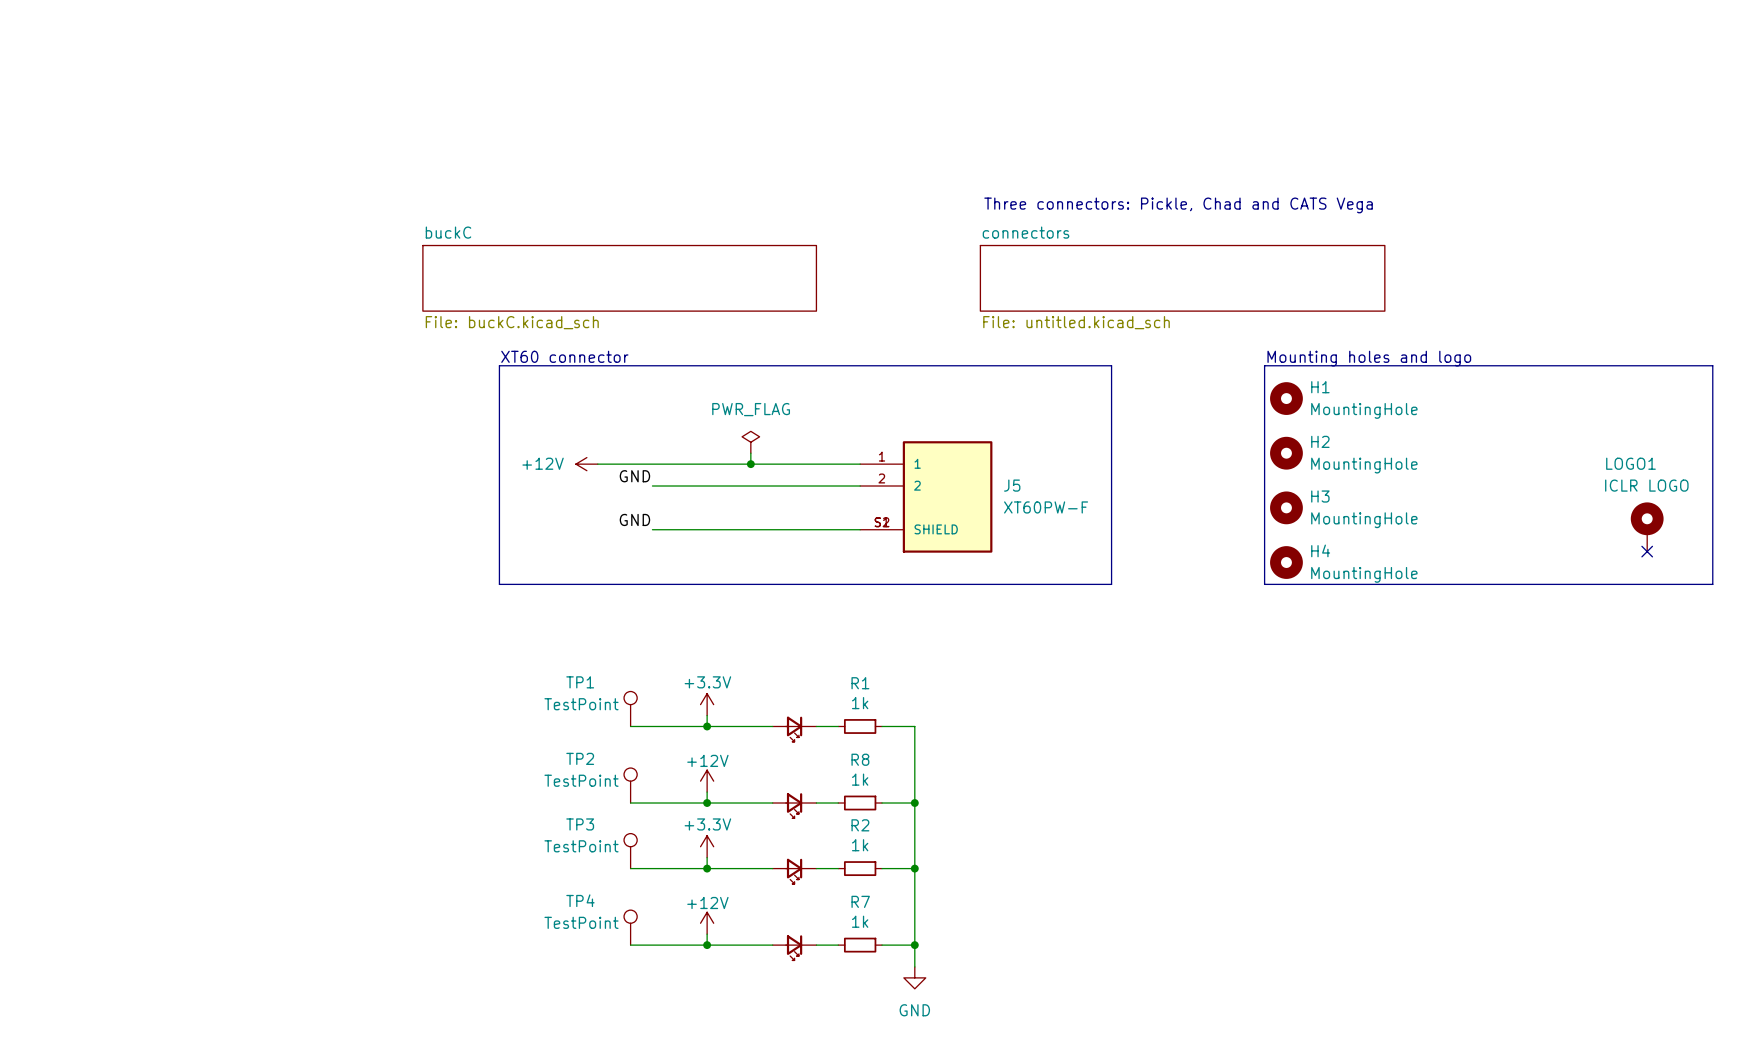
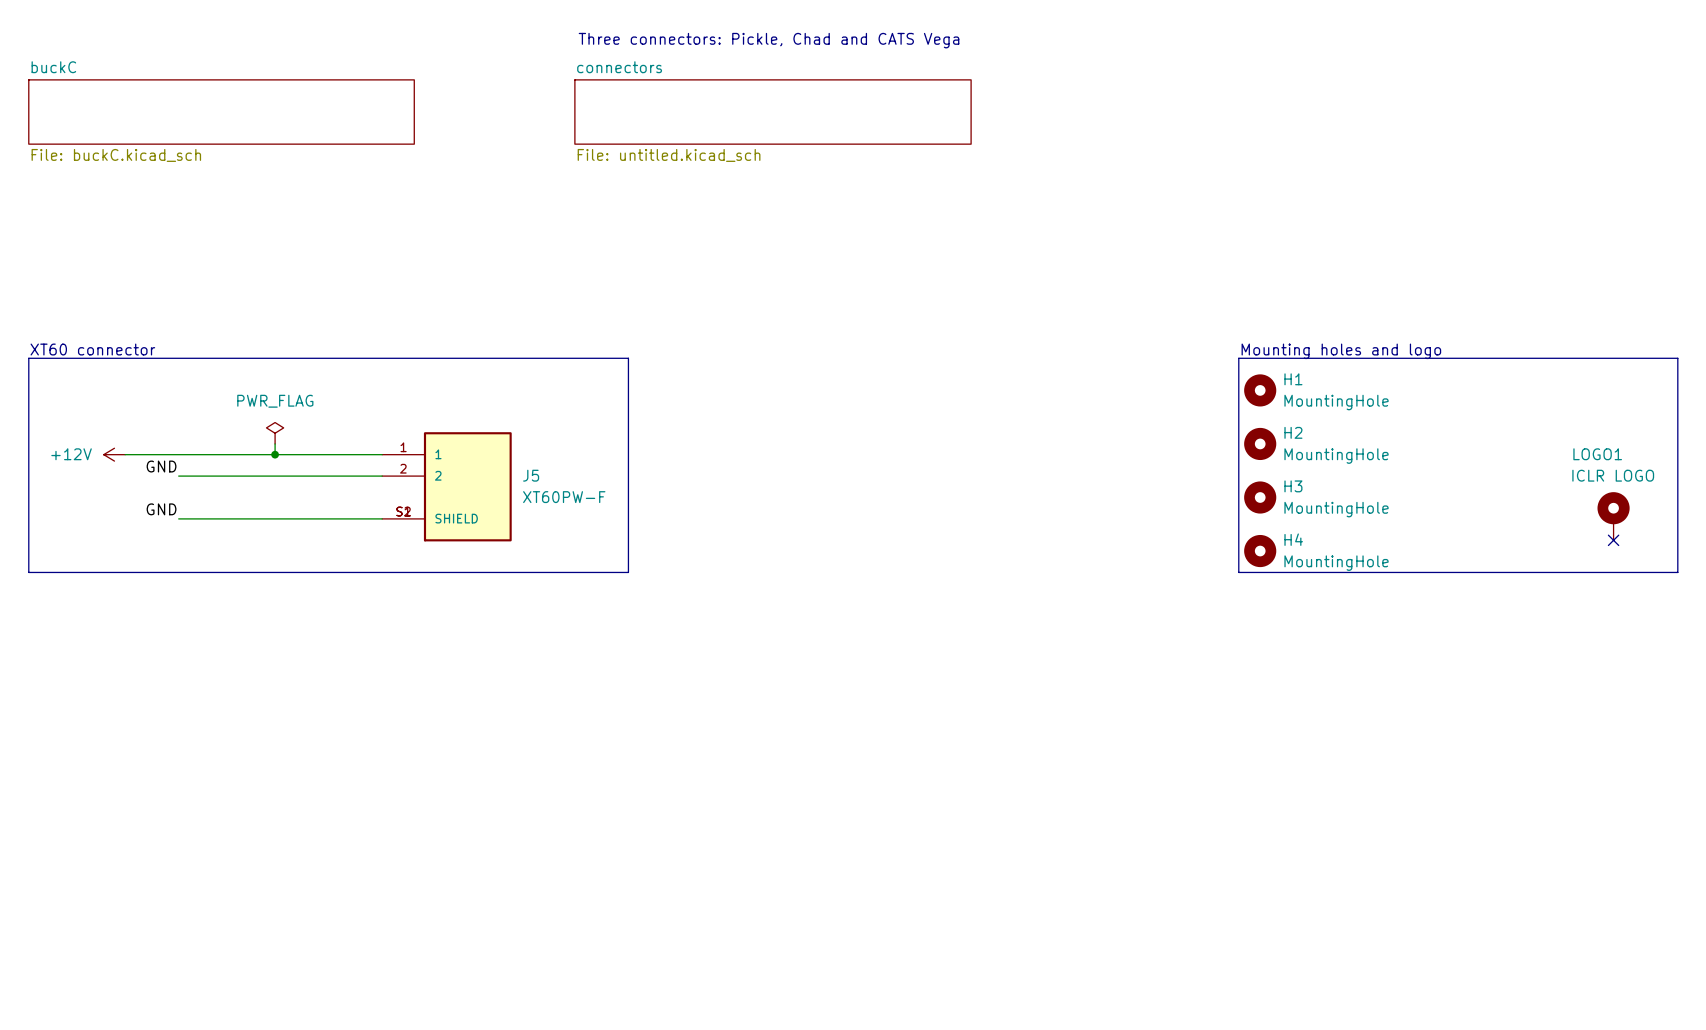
text: none -> Three connectors: Pickle, Chad and CATS Vega (769, 40)
sheet buckC: none -> File: buckC.kicad_sch (221, 112)
sheet connectors: none -> File: untitled.kicad_sch (772, 112)
text: Three connectors: Pickle, Chad and CATS Vega (1178, 205) -> none
sheet buckC: File: buckC.kicad_sch (619, 278) -> none
sheet connectors: File: untitled.kicad_sch (1182, 278) -> none
text: none -> XT60 connector (92, 349)
text: XT60 connector (564, 356) -> none
line: (499, 365) (499, 584) -> (489, 358) (28, 358) (28, 572) (489, 572)
line: (641, 365) (1111, 365) (1111, 584) (641, 584) -> (628, 358) (628, 572)
power symbol: none -> PWR_FLAG (275, 433)
power symbol: PWR_FLAG (750, 442) -> none
wire: none -> (275, 443) (275, 454)
wire: (750, 453) (750, 464) -> none
power symbol: none -> +12V (114, 454)
wire: none -> (125, 454) (382, 454)
junction: none -> (275, 454)
power symbol: +12V (586, 464) -> none
wire: (597, 464) (860, 464) -> none
junction: (750, 464) -> none
label: none -> GND (161, 466)
label: GND (634, 476) -> none
wire: none -> (178, 476) (382, 476)
wire: (652, 486) (860, 486) -> none
J5 position: (926, 496) -> (446, 486)
label: none -> GND (161, 509)
label: GND (634, 519) -> none
wire: none -> (178, 518) (382, 518)
wire: (652, 529) (860, 529) -> none
power symbol: +3.3V (707, 704) -> none
TP1: TestPoint (630, 708) -> none
wire: (707, 715) (707, 726) -> none
wire: (630, 726) (772, 726) -> none
junction: (707, 726) -> none
wire: (816, 726) (838, 726) -> none
R1: 1k (860, 726) -> none
wire: (882, 726) (914, 726) (914, 966) -> none
part: (794, 729) -> none
power symbol: +12V (707, 781) -> none
TP2: TestPoint (630, 785) -> none
wire: (707, 792) (707, 803) -> none
wire: (630, 803) (772, 803) -> none
junction: (707, 803) -> none
wire: (816, 803) (838, 803) -> none
R8: 1k (860, 803) -> none
wire: (882, 803) (914, 803) -> none
junction: (914, 803) -> none
part: (794, 805) -> none
power symbol: +3.3V (707, 846) -> none
TP3: TestPoint (630, 851) -> none
wire: (707, 857) (707, 868) -> none
wire: (630, 868) (772, 868) -> none
junction: (707, 868) -> none
wire: (816, 868) (838, 868) -> none
R2: 1k (860, 868) -> none
wire: (882, 868) (914, 868) -> none
junction: (914, 868) -> none
part: (794, 871) -> none
power symbol: +12V (707, 923) -> none
TP4: TestPoint (630, 927) -> none
wire: (707, 934) (707, 945) -> none
wire: (630, 945) (772, 945) -> none
junction: (707, 945) -> none
wire: (816, 945) (838, 945) -> none
R7: 1k (860, 945) -> none
wire: (882, 945) (914, 945) -> none
junction: (914, 945) -> none
part: (794, 947) -> none
power symbol: GND (914, 977) -> none

